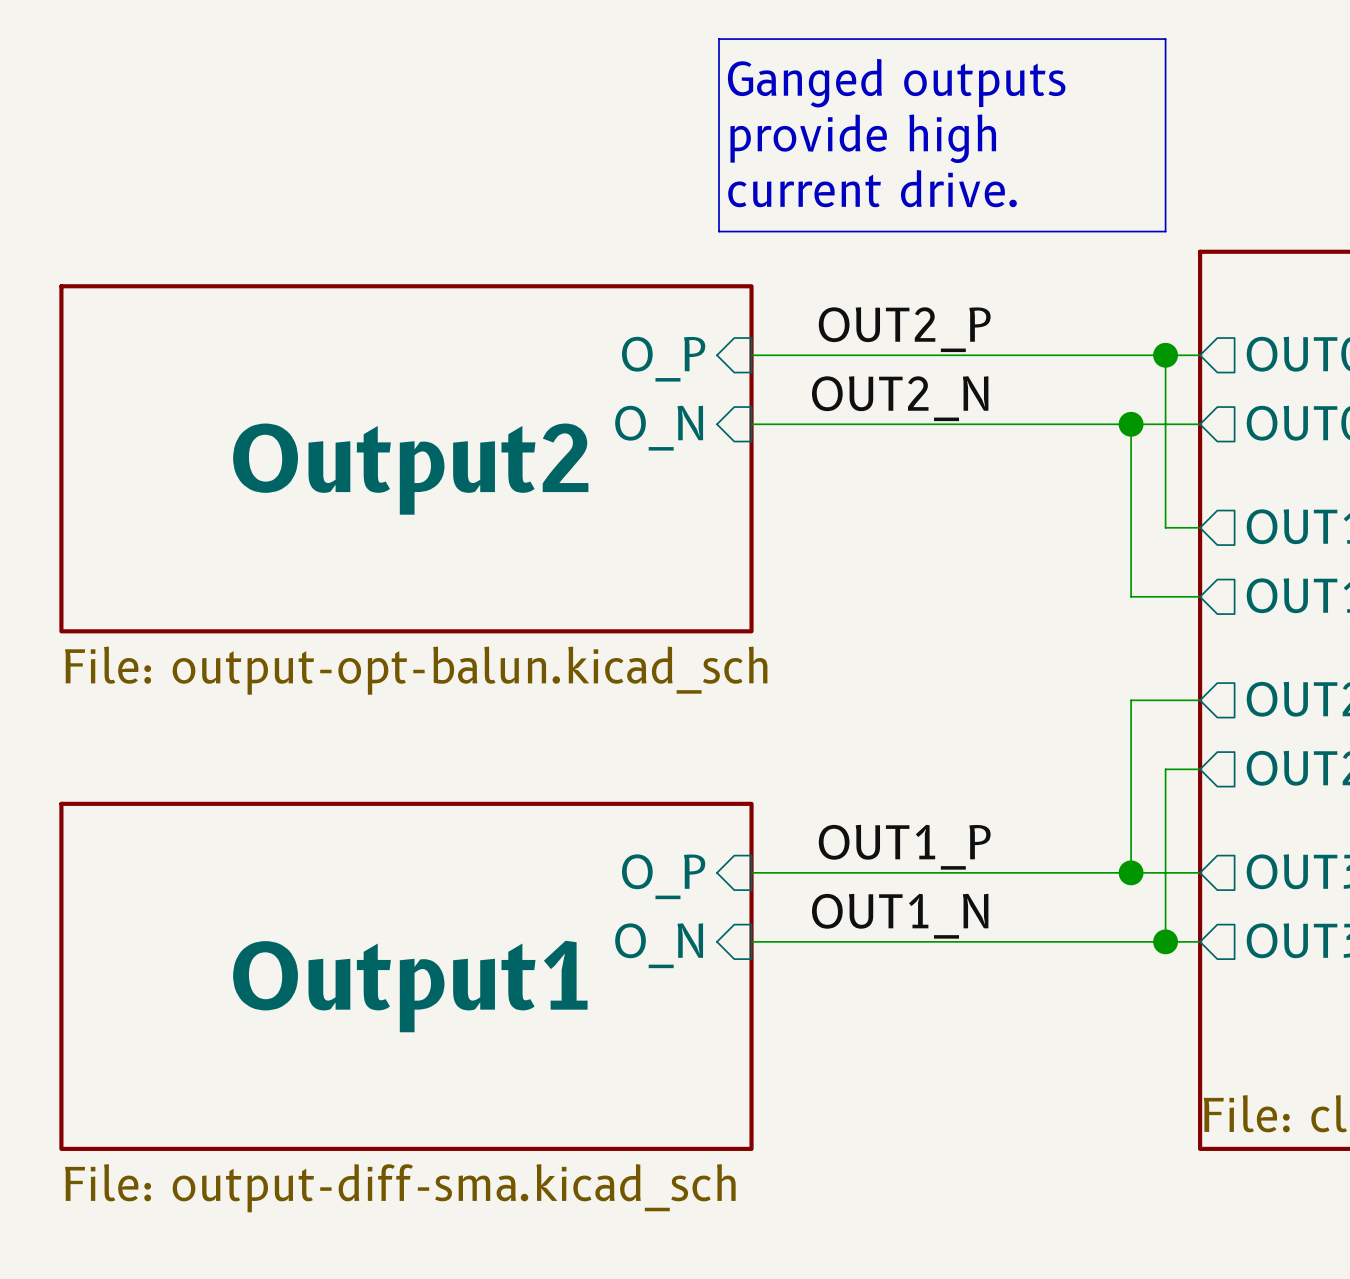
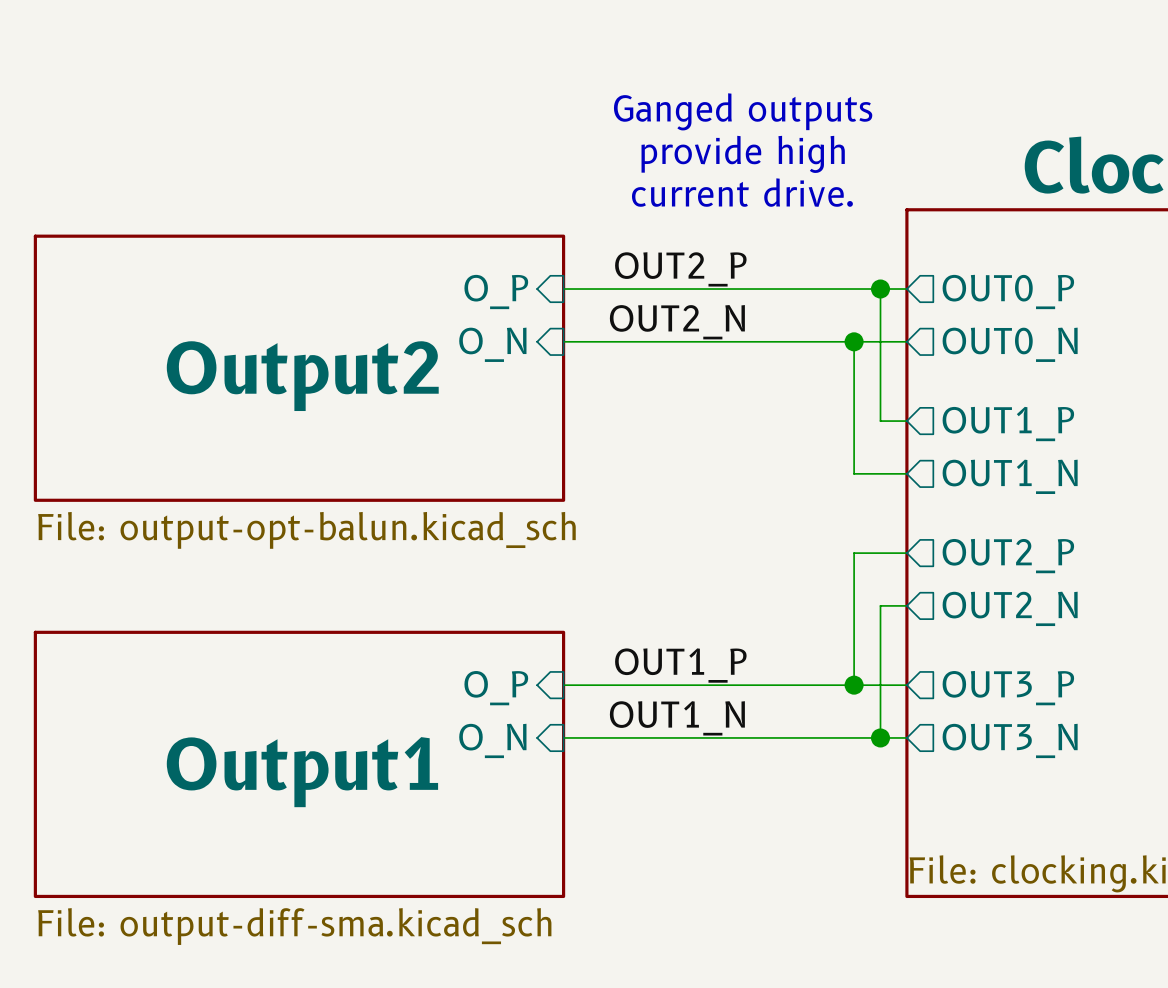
line: (719, 39) (1165, 39) (1165, 231) (719, 231) (719, 39) -> none
text position: Ganged outputs (896, 83) -> Ganged outputs (743, 111)
text position: provide high (863, 138) -> provide high (743, 154)
text position: current drive. (872, 188) -> current drive. (742, 192)

